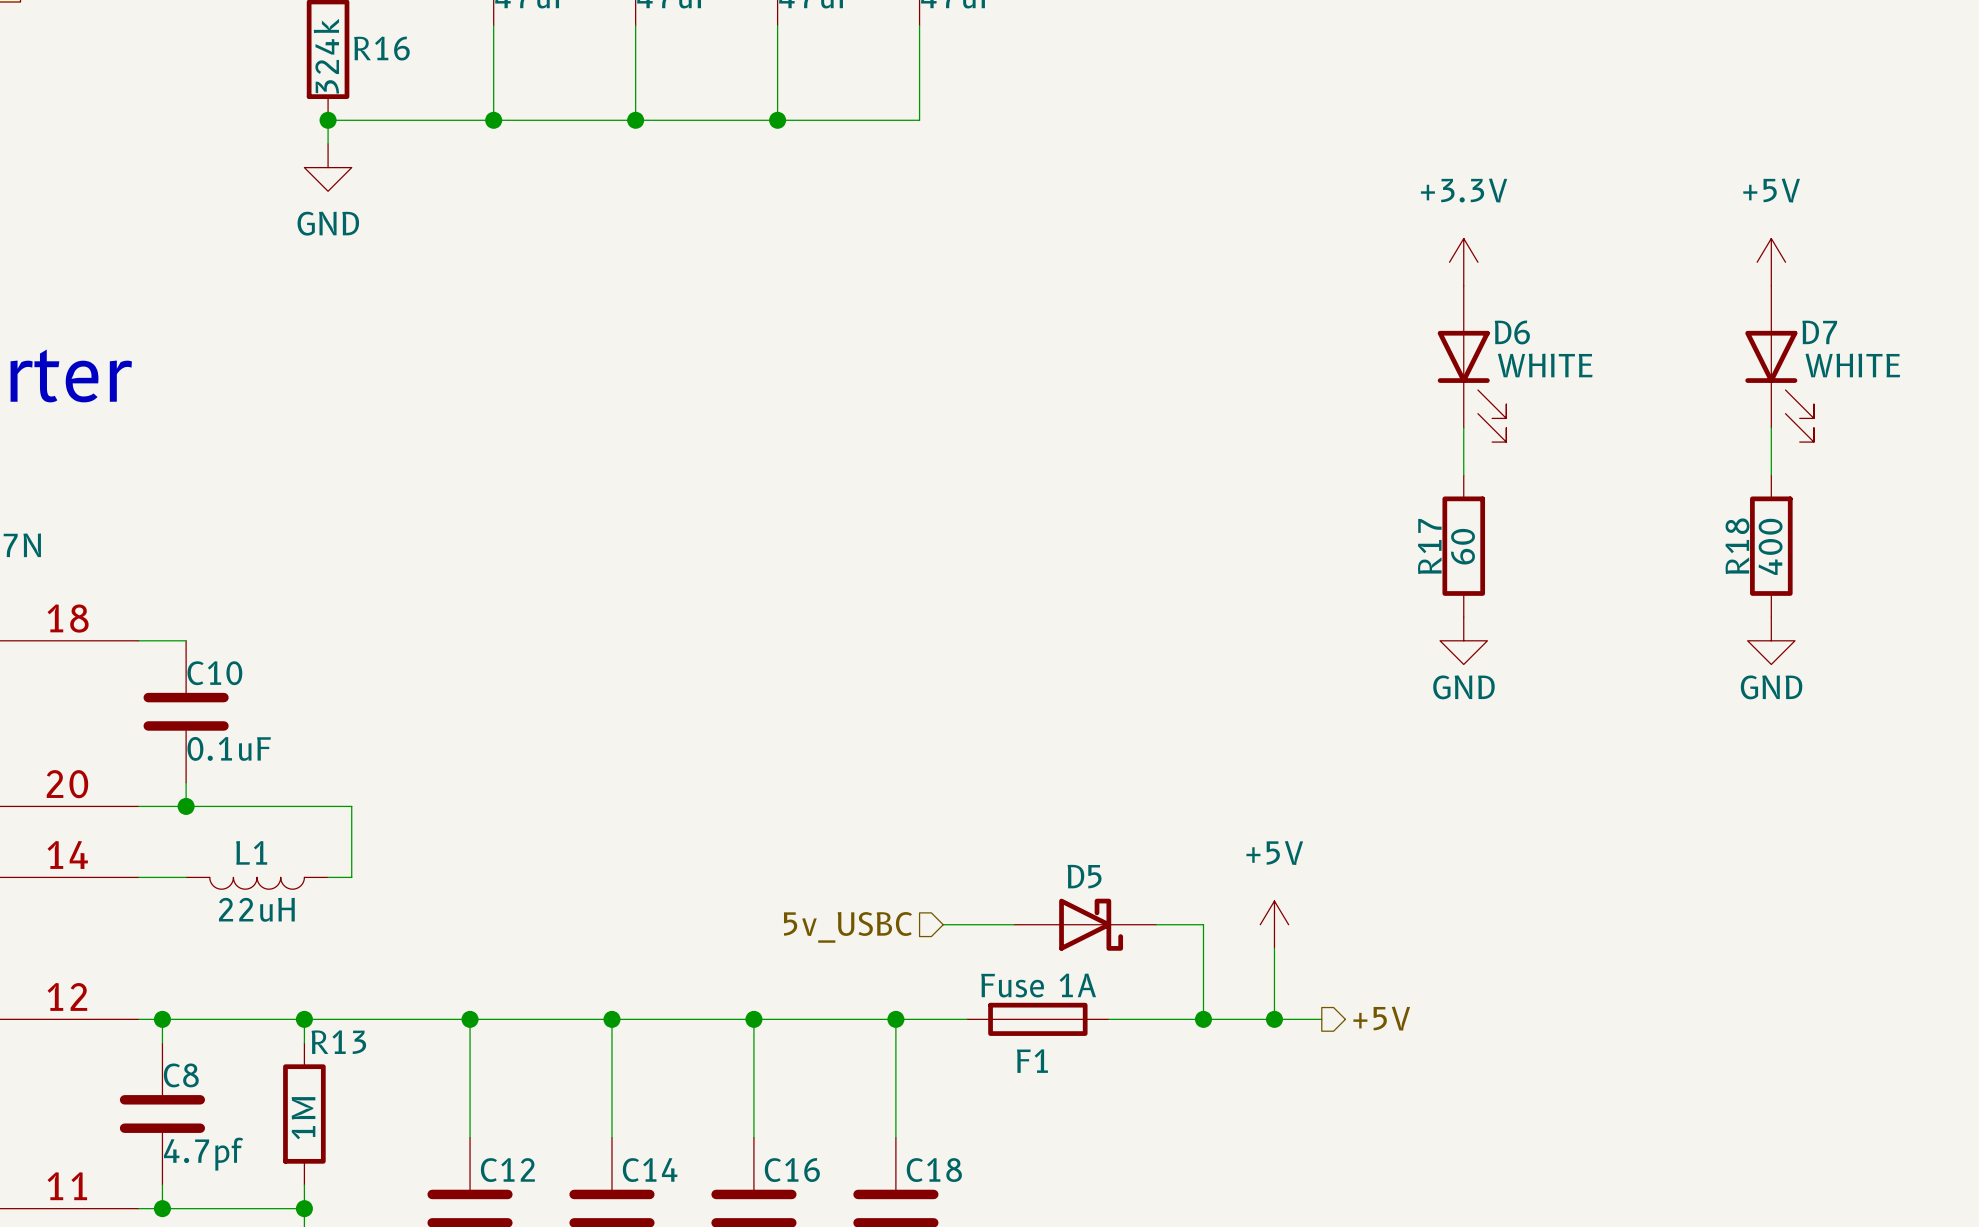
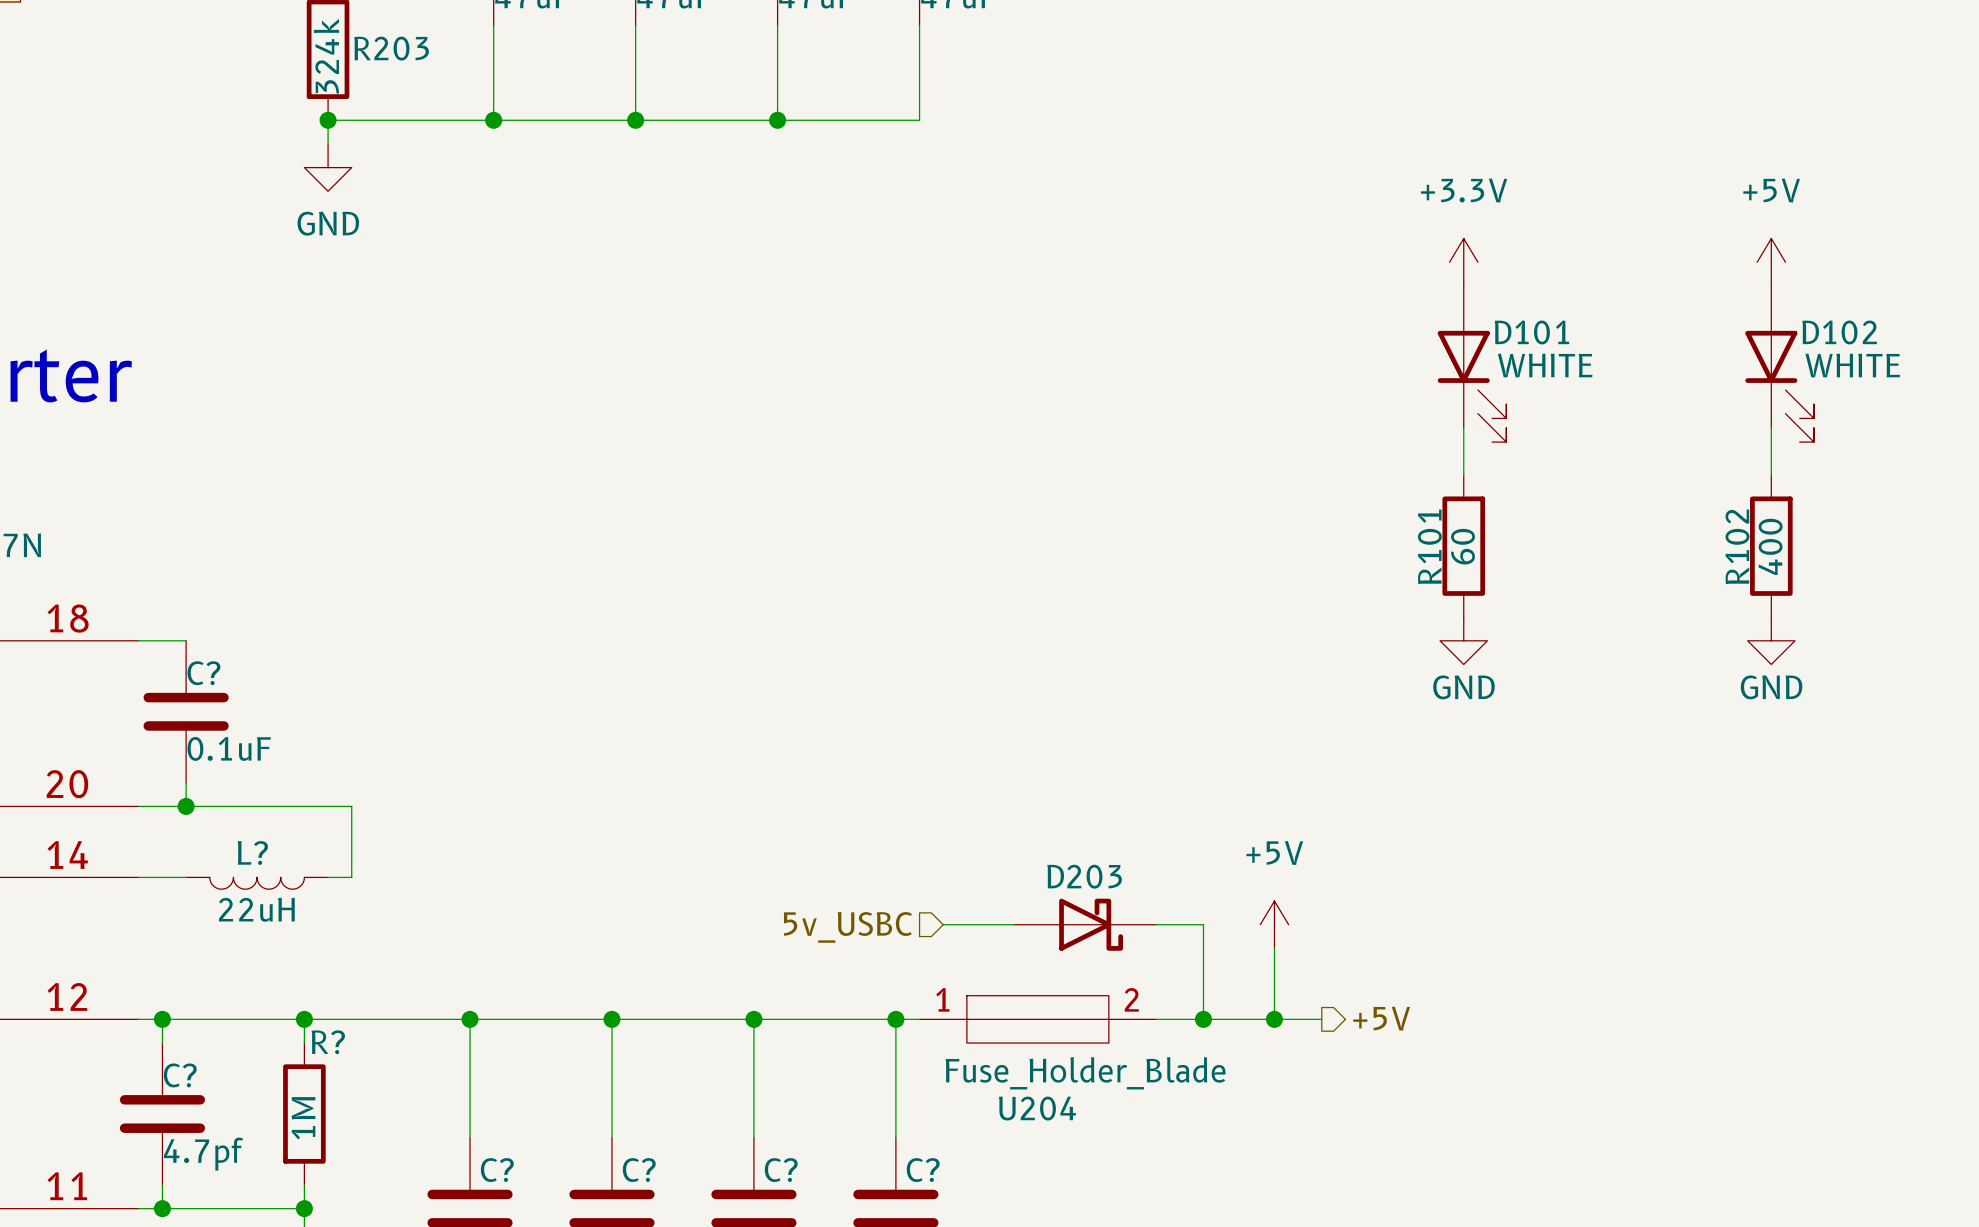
R16 name: R16 (381, 48) -> R203 (391, 48)
D6 name: D6 (1512, 332) -> D101 (1531, 332)
D7 name: D7 (1819, 332) -> D102 (1839, 332)
R17 name: R17 (1429, 546) -> R101 (1429, 546)
R18 name: R18 (1737, 546) -> R102 (1737, 546)
C10 name: C10 (214, 673) -> C? (203, 673)
L1 name: L1 (251, 852) -> L? (252, 852)
D5 name: D5 (1084, 876) -> D203 (1084, 876)
F1: Fuse 1A (1037, 1019) -> none
U204: none -> Fuse_Holder_Blade (1037, 1019)
R13 name: R13 (338, 1042) -> R? (328, 1042)
C8 name: C8 (181, 1075) -> C? (180, 1075)
C12 name: C12 (507, 1170) -> C? (497, 1170)
C14 name: C14 (650, 1170) -> C? (639, 1170)
C16 name: C16 (792, 1170) -> C? (781, 1170)
C18 name: C18 (934, 1170) -> C? (923, 1170)

